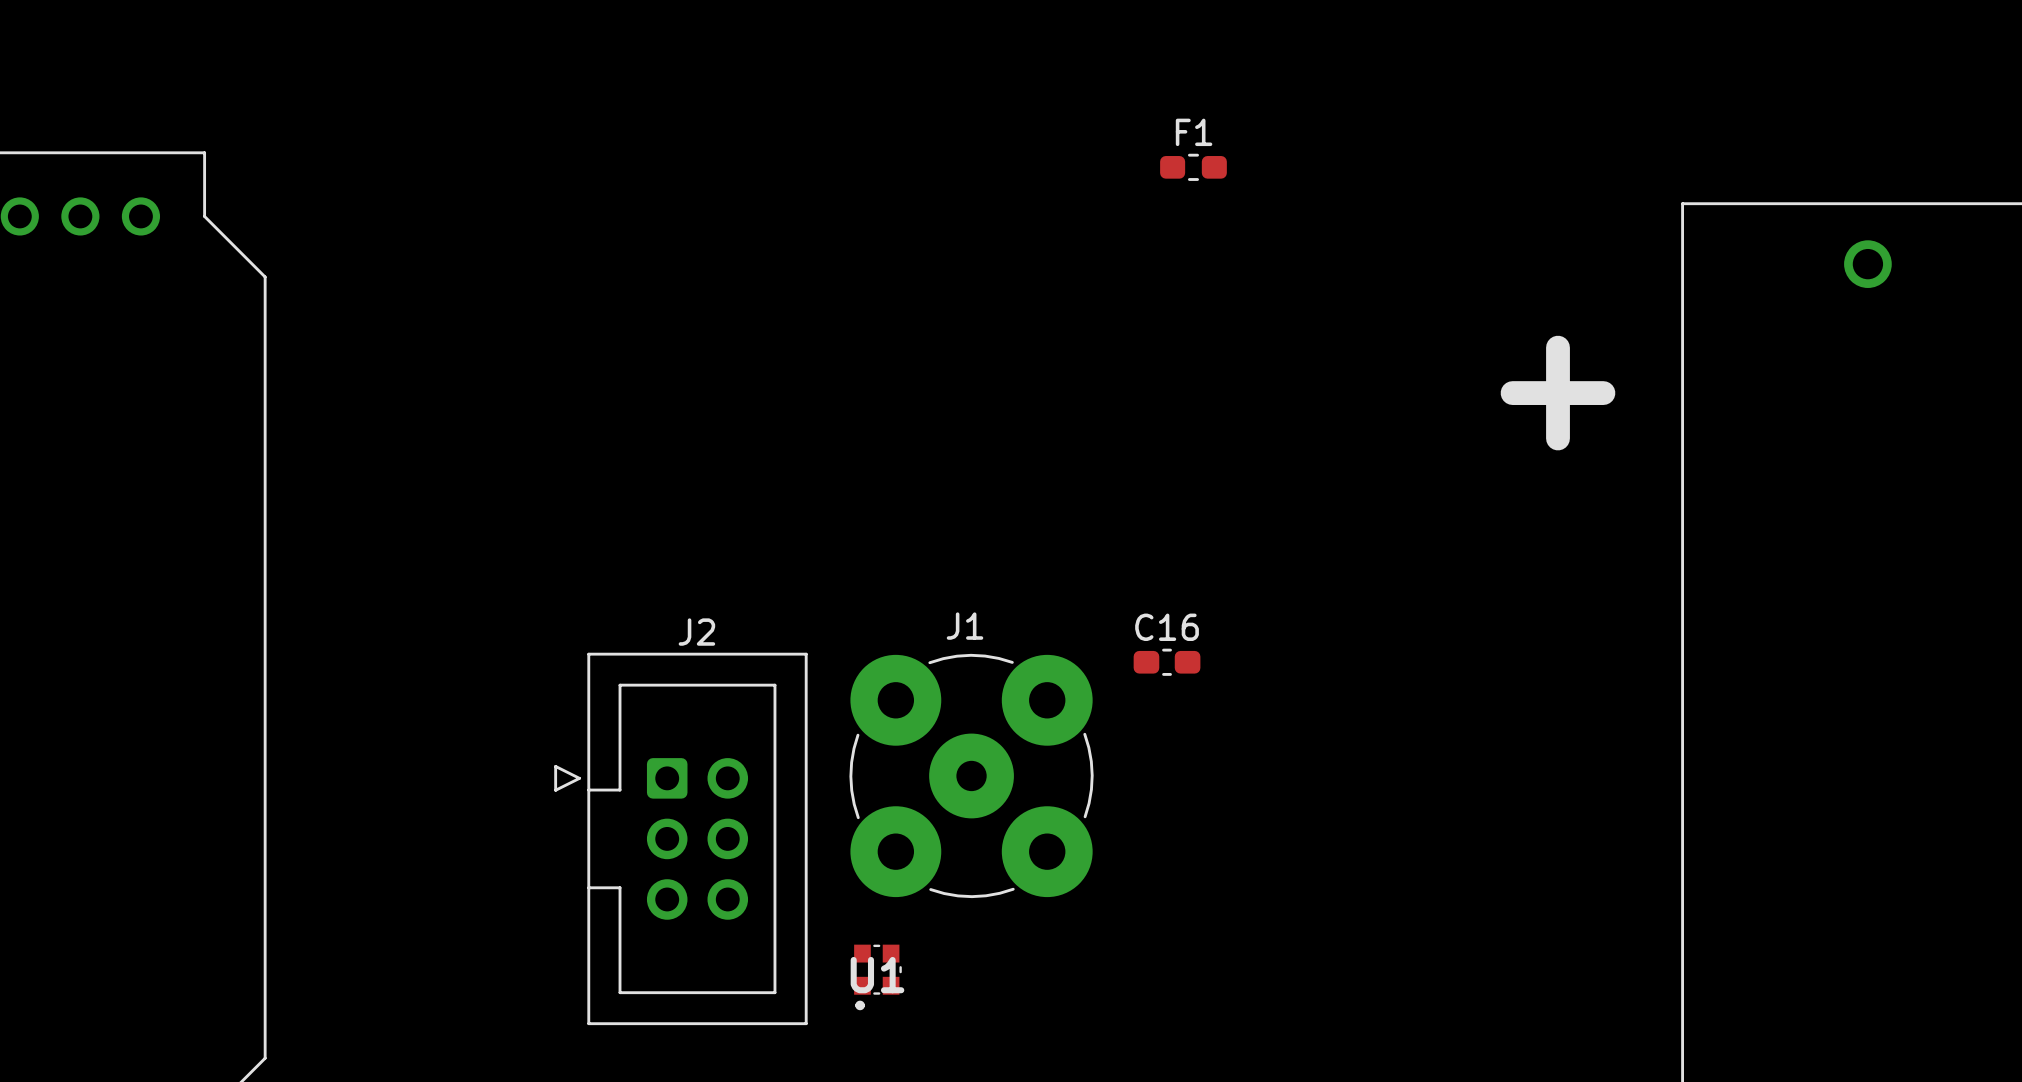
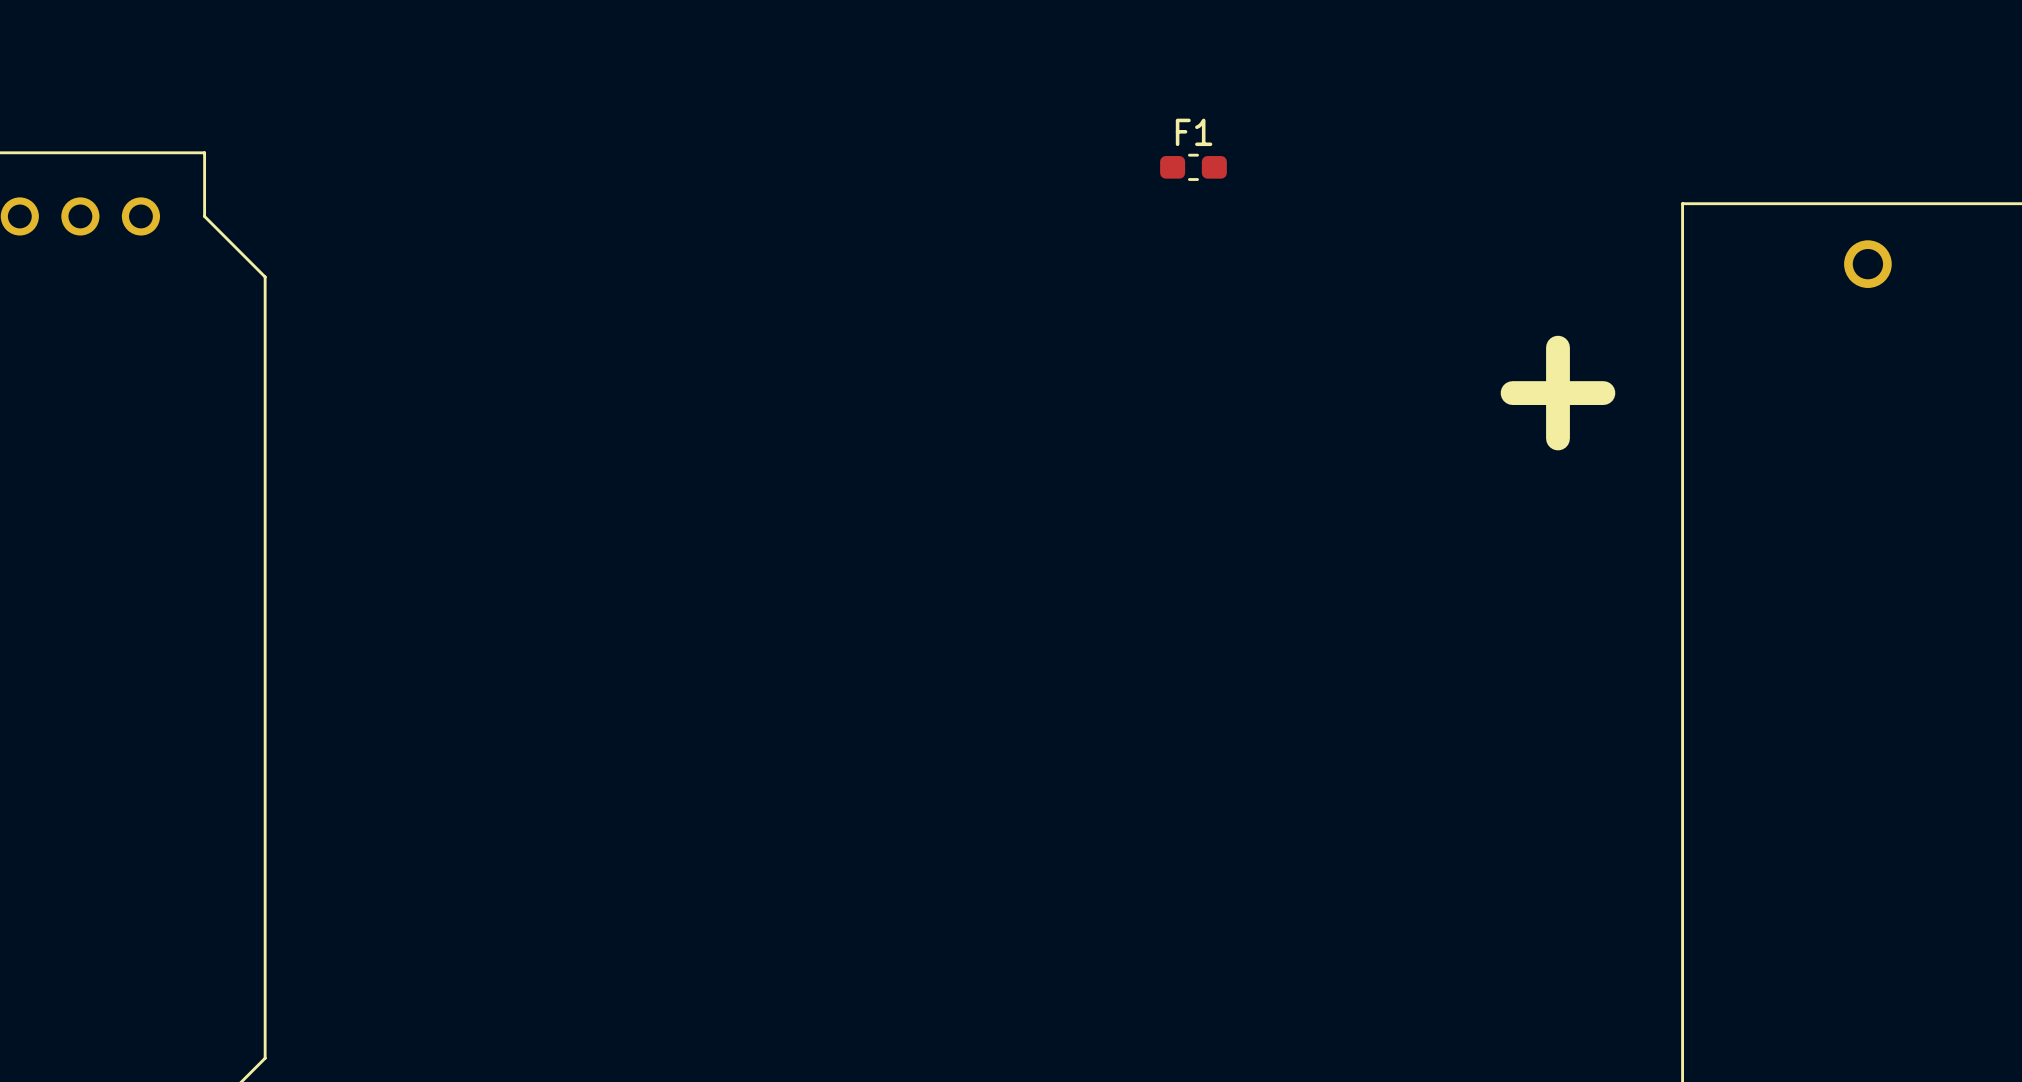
C16: (1167, 662) -> none
J1: (971, 775) -> none
J2: (680, 838) -> none
U1: (876, 977) -> none

